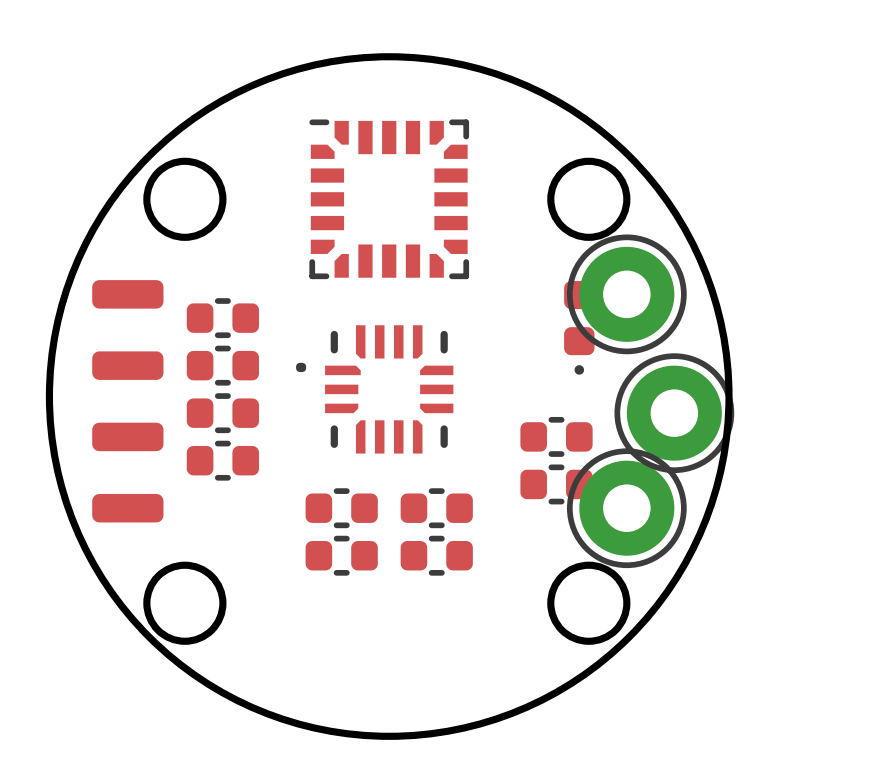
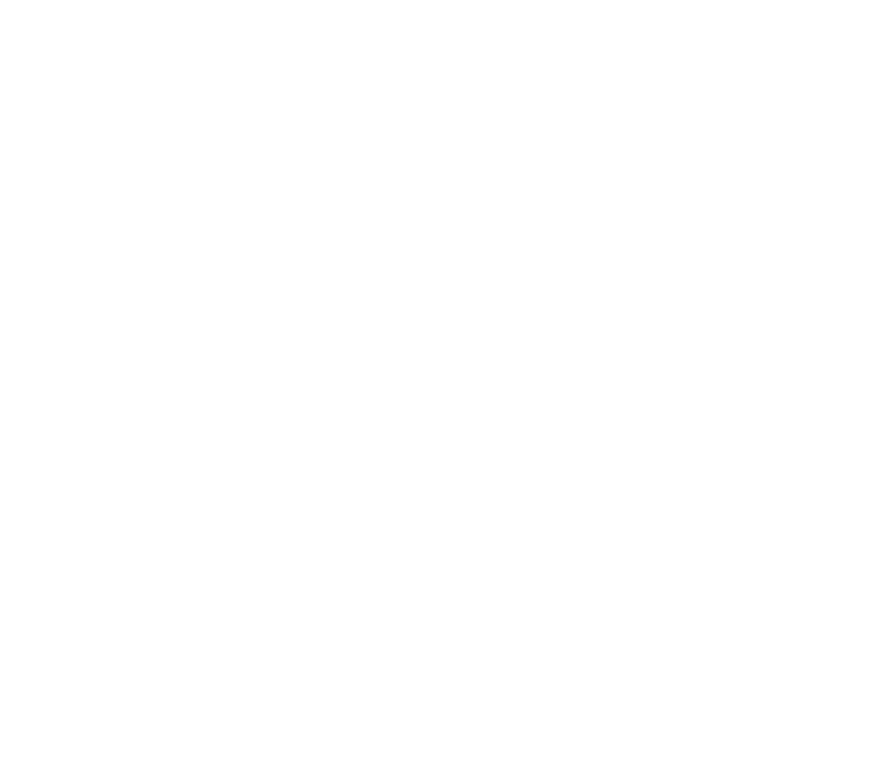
round board edge: [45, 53, 733, 740] -> none
round board edge: [143, 157, 227, 241] -> none
round board edge: [547, 157, 631, 241] -> none
part: (389, 199) -> none
part: (127, 294) -> none
part: (626, 294) -> none
part: (222, 318) -> none
part: (579, 327) -> none
part: (127, 365) -> none
part: (222, 365) -> none
part: (389, 389) -> none
part: (222, 413) -> none
part: (674, 413) -> none
part: (127, 436) -> none
part: (556, 436) -> none
part: (222, 460) -> none
part: (556, 484) -> none
part: (127, 508) -> none
part: (341, 508) -> none
part: (436, 508) -> none
part: (626, 508) -> none
part: (341, 555) -> none
part: (436, 555) -> none
round board edge: [143, 561, 227, 645] -> none
round board edge: [547, 561, 631, 645] -> none

